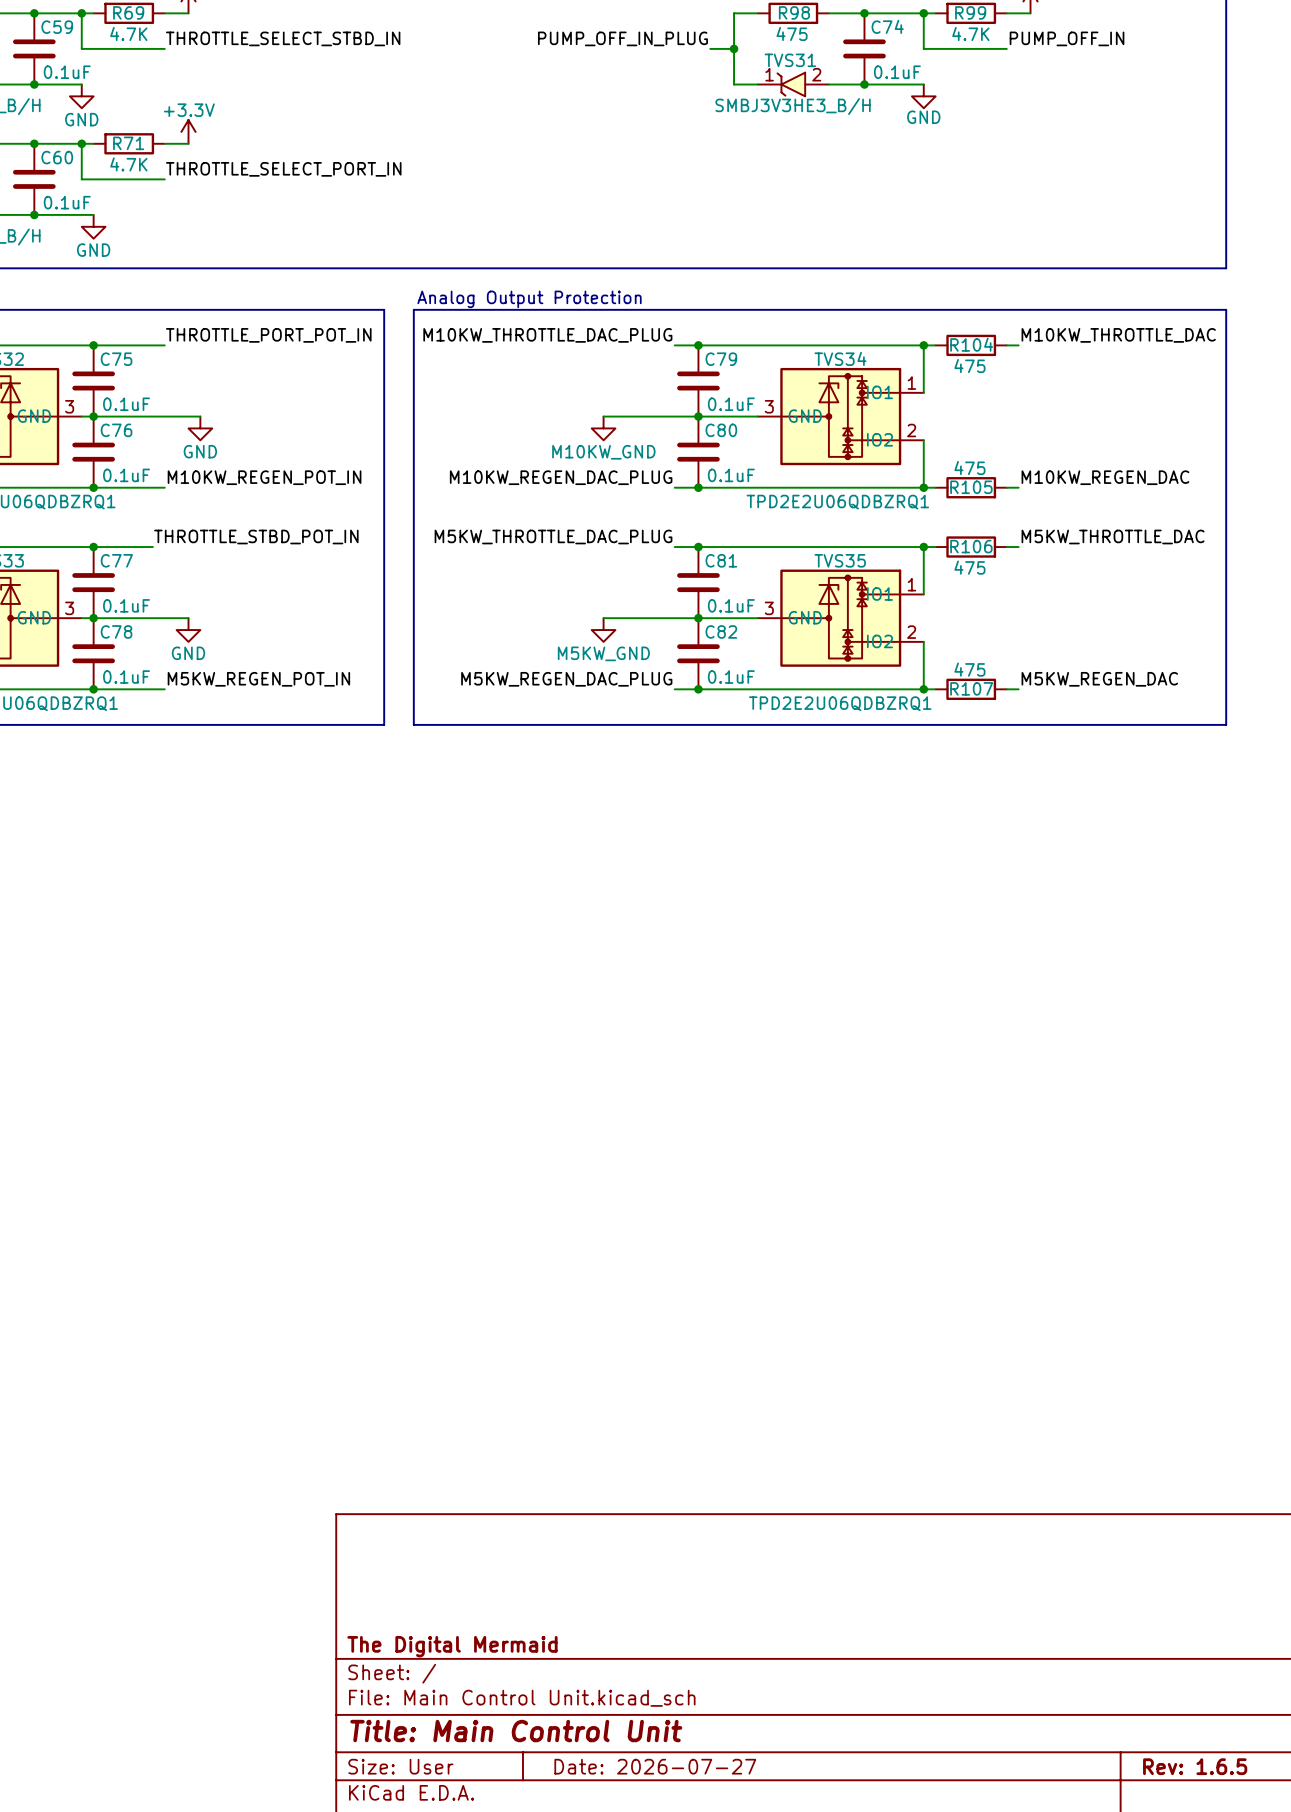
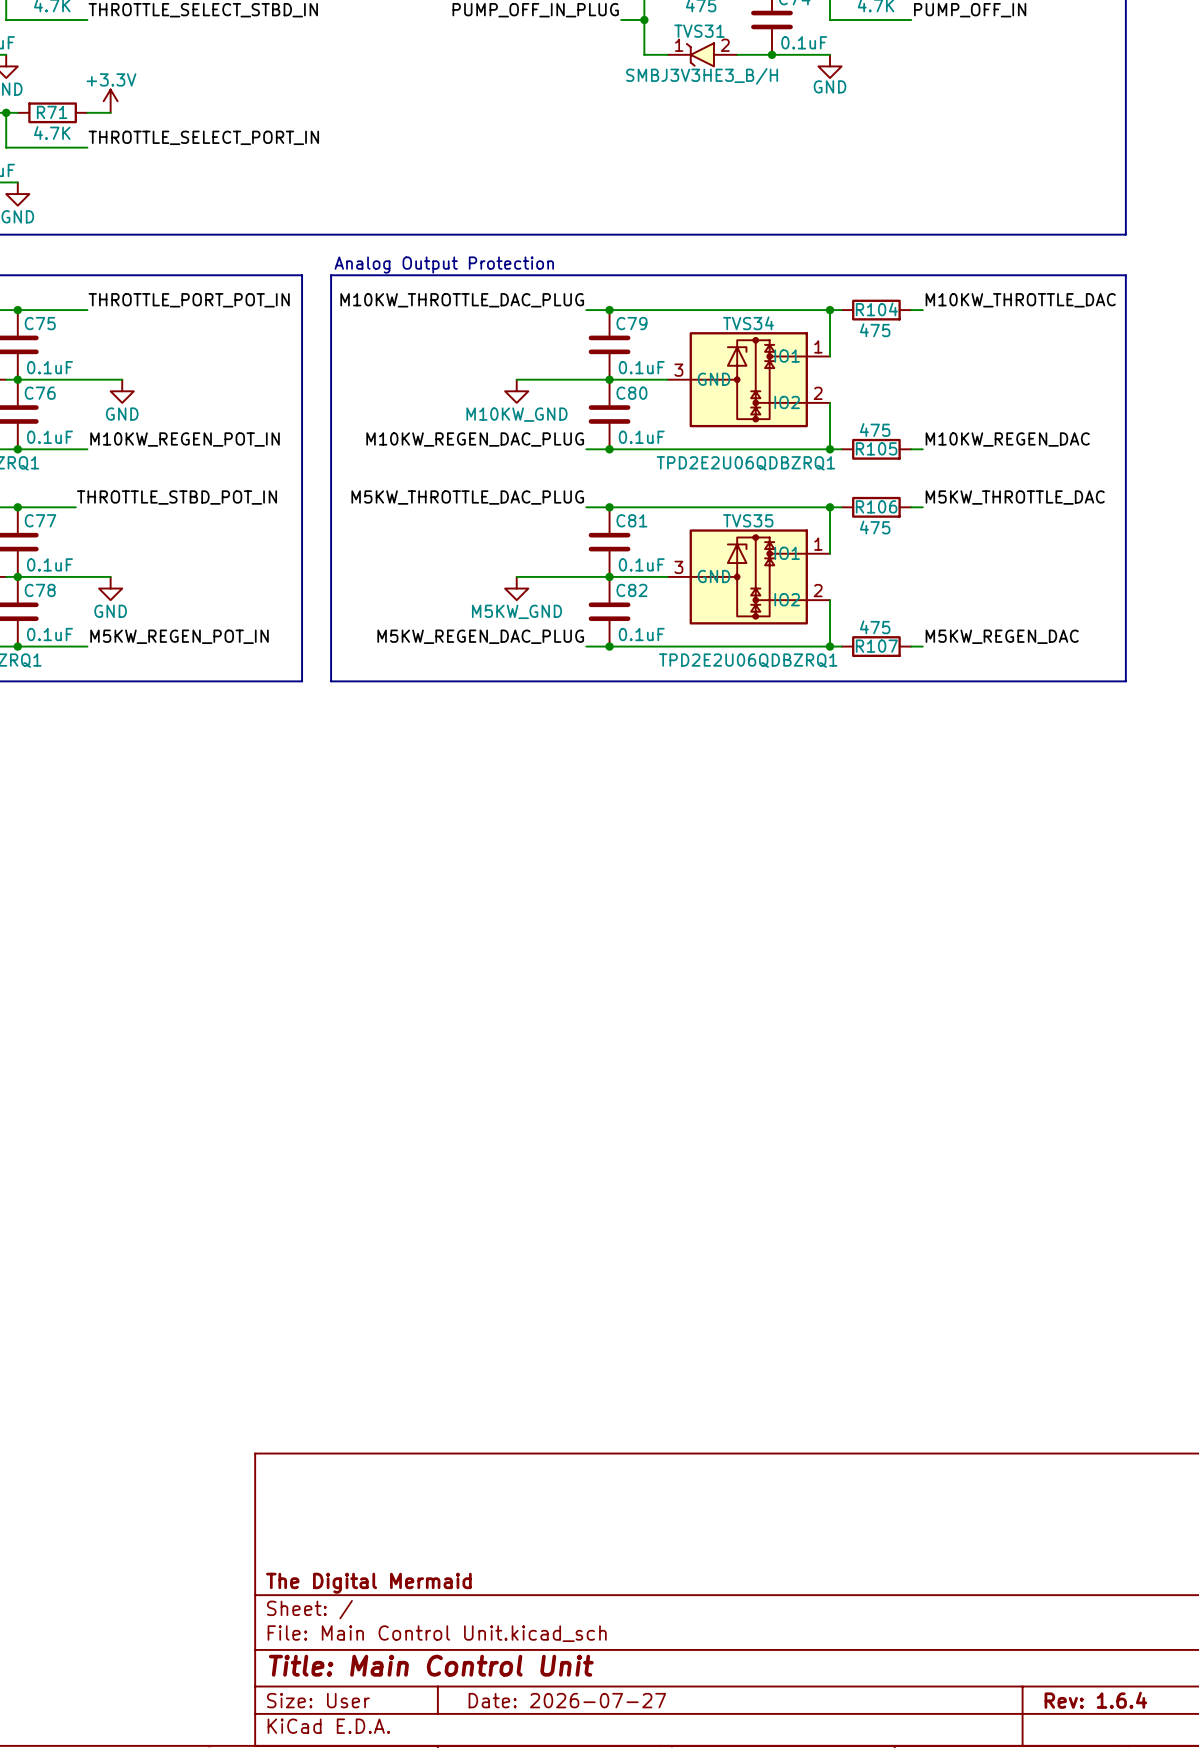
title block: Rev: 1.6.5 (1195, 1766) -> Rev: 1.6.4 (1095, 1700)

